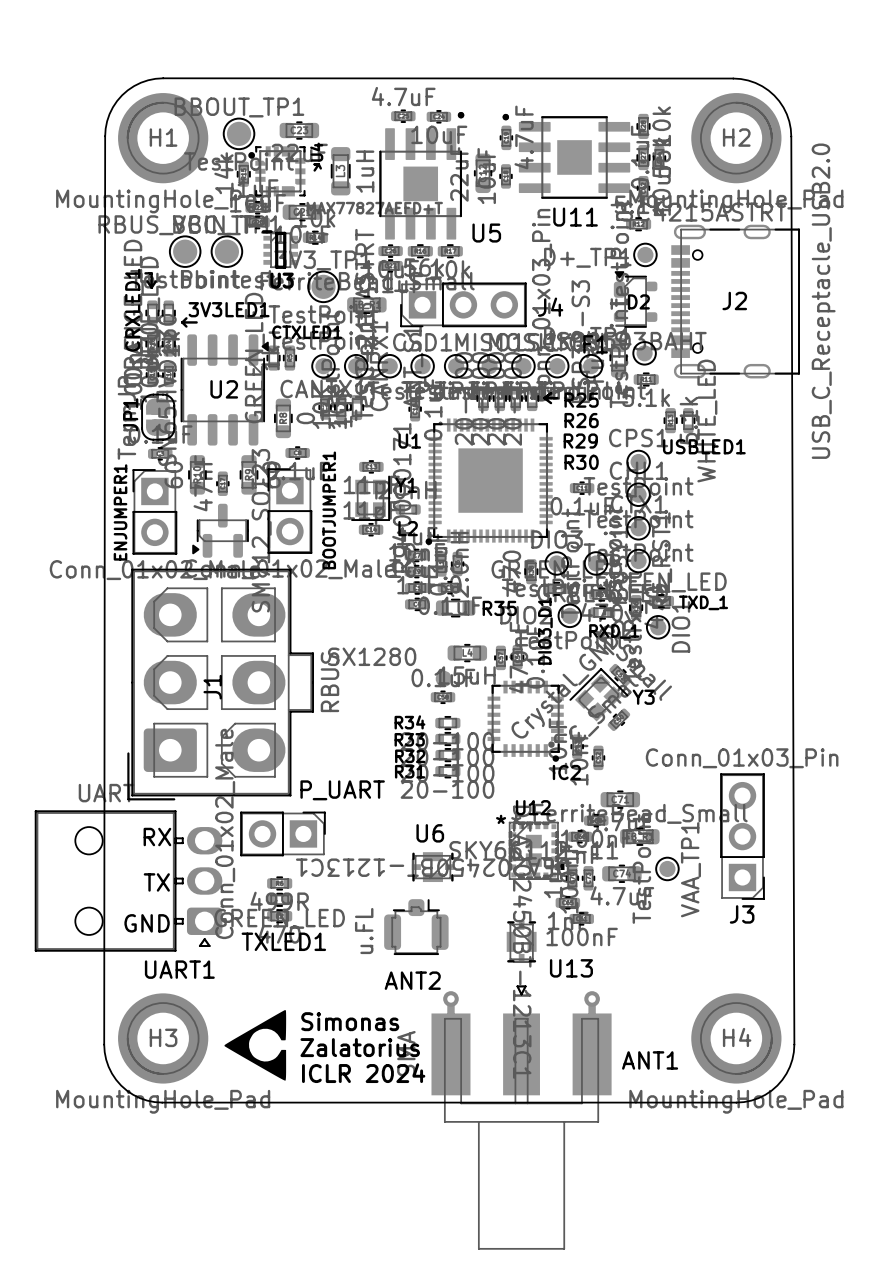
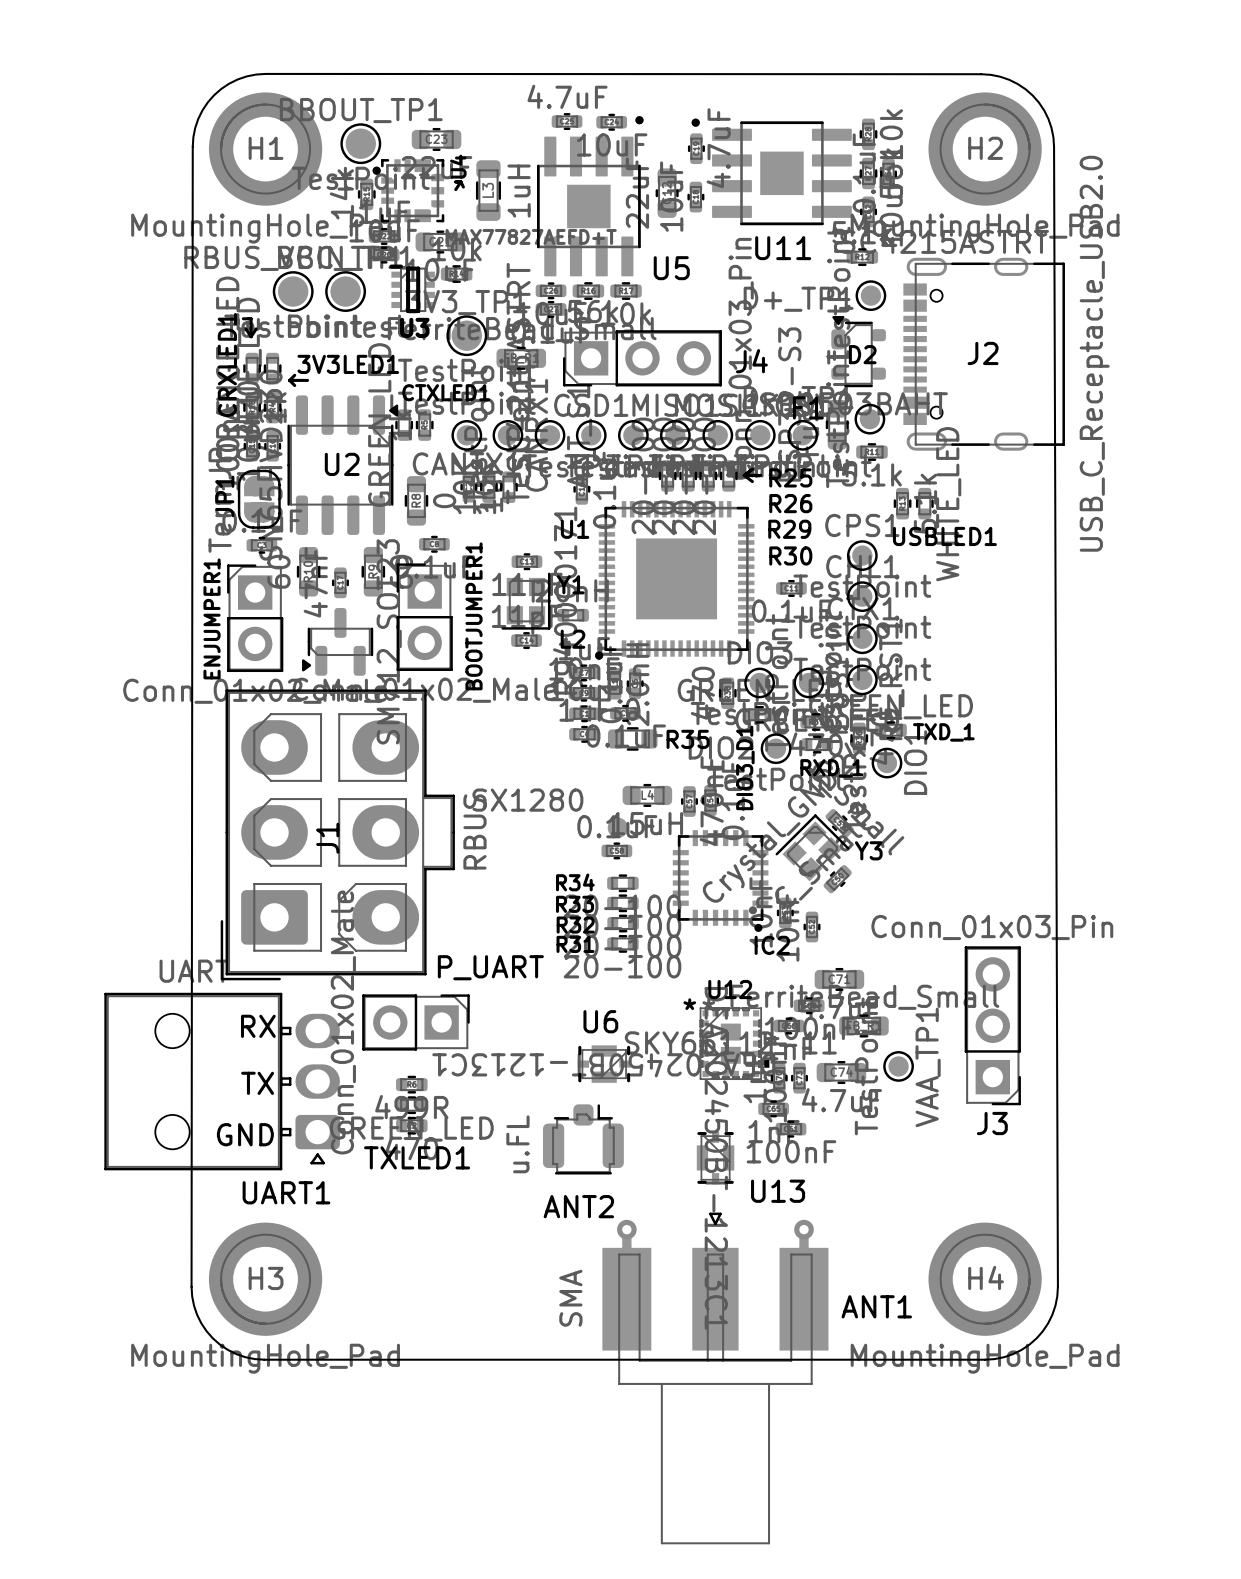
drawing: [224, 1010, 287, 1081] -> none
text: Simonas (350, 1021) -> none
text: Zalatorius (360, 1047) -> none
text: ICLR 2024 (363, 1073) -> none

